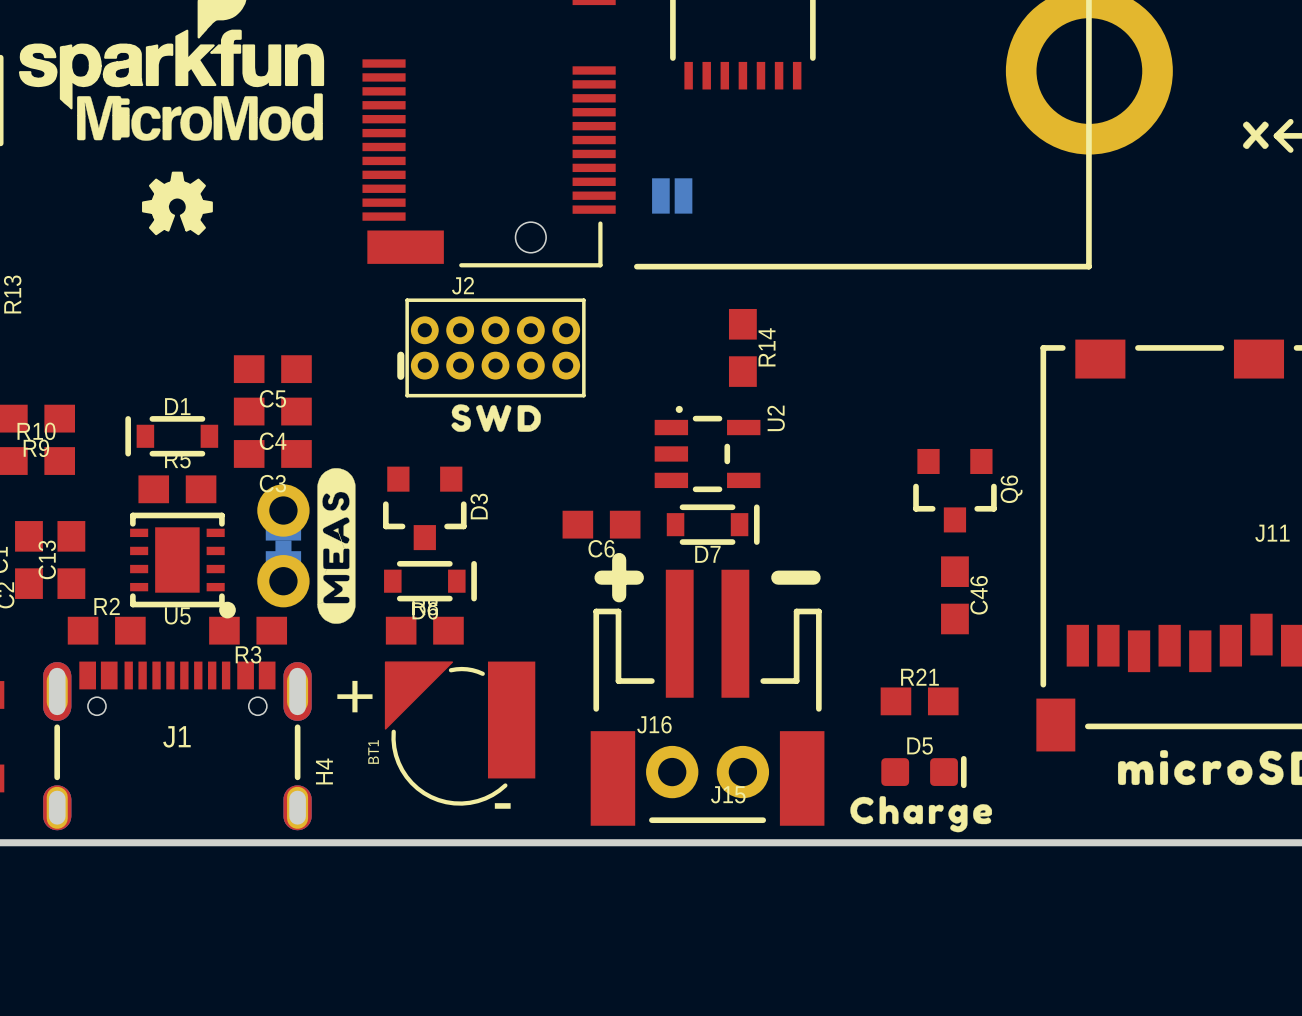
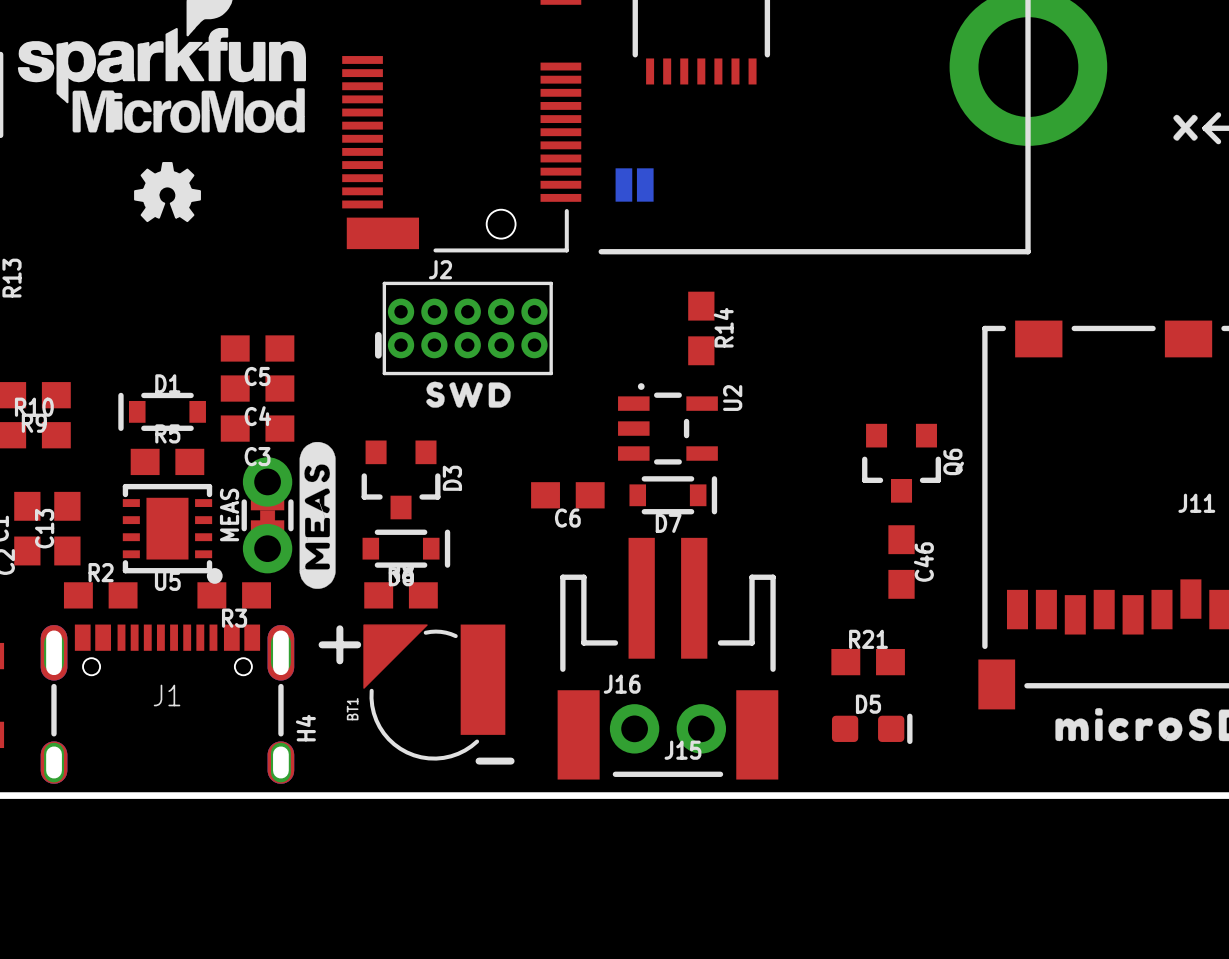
MEAS side: bottom (283, 545) -> top (267, 515)
line: (619, 559) (619, 595) -> none
line: (601, 577) (636, 577) -> none
line: (778, 577) (813, 577) -> none
drawing: [850, 796, 993, 833] -> none

